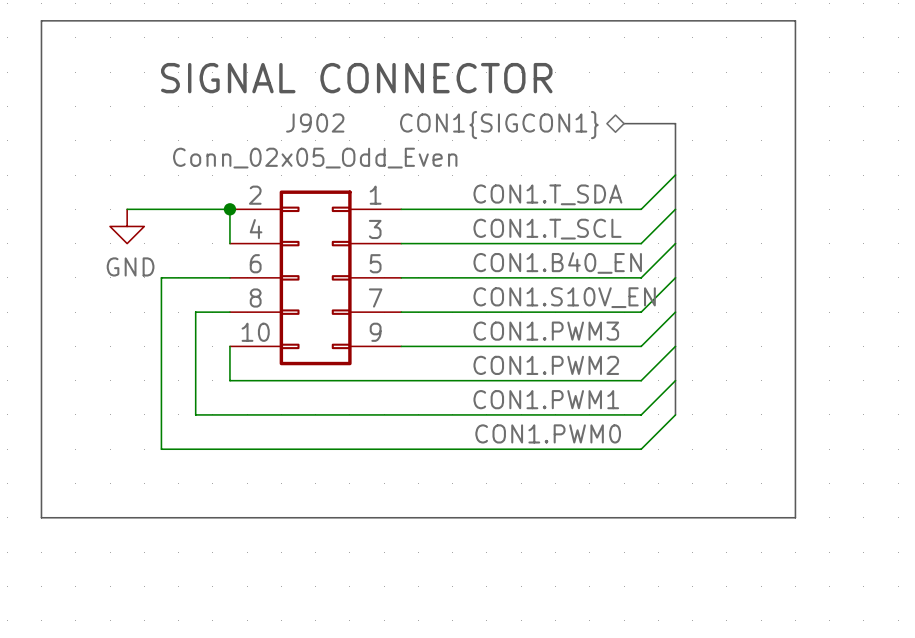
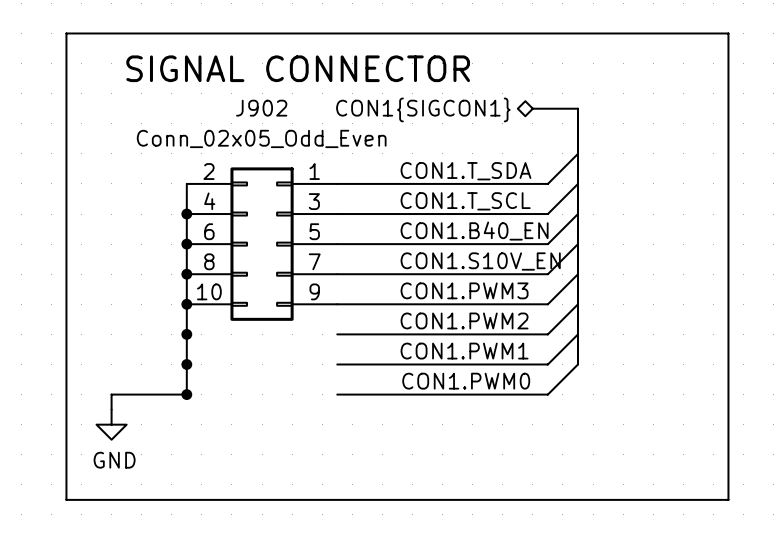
line: (41, 20) (795, 20) (795, 517) (41, 517) (41, 20) -> (66, 33) (66, 499) (728, 499) (728, 33) (66, 33)
wire: (127, 209) (229, 209) -> none
junction: (229, 209) -> none
power symbol position: GND (127, 226) -> GND (111, 424)
wire: none -> (186, 214) (186, 304)
junction: none -> (186, 214)
wire: (229, 277) (161, 277) (161, 449) -> (111, 409) (111, 394) (126, 394)
junction: none -> (186, 244)
wire: (229, 312) (195, 312) (195, 414) (401, 414) -> none
junction: none -> (186, 274)
junction: none -> (186, 304)
wire: (229, 380) (401, 380) -> (186, 334) (186, 394)
junction: none -> (186, 334)
junction: none -> (186, 364)
wire: (229, 449) (401, 449) -> none
junction: none -> (186, 394)

